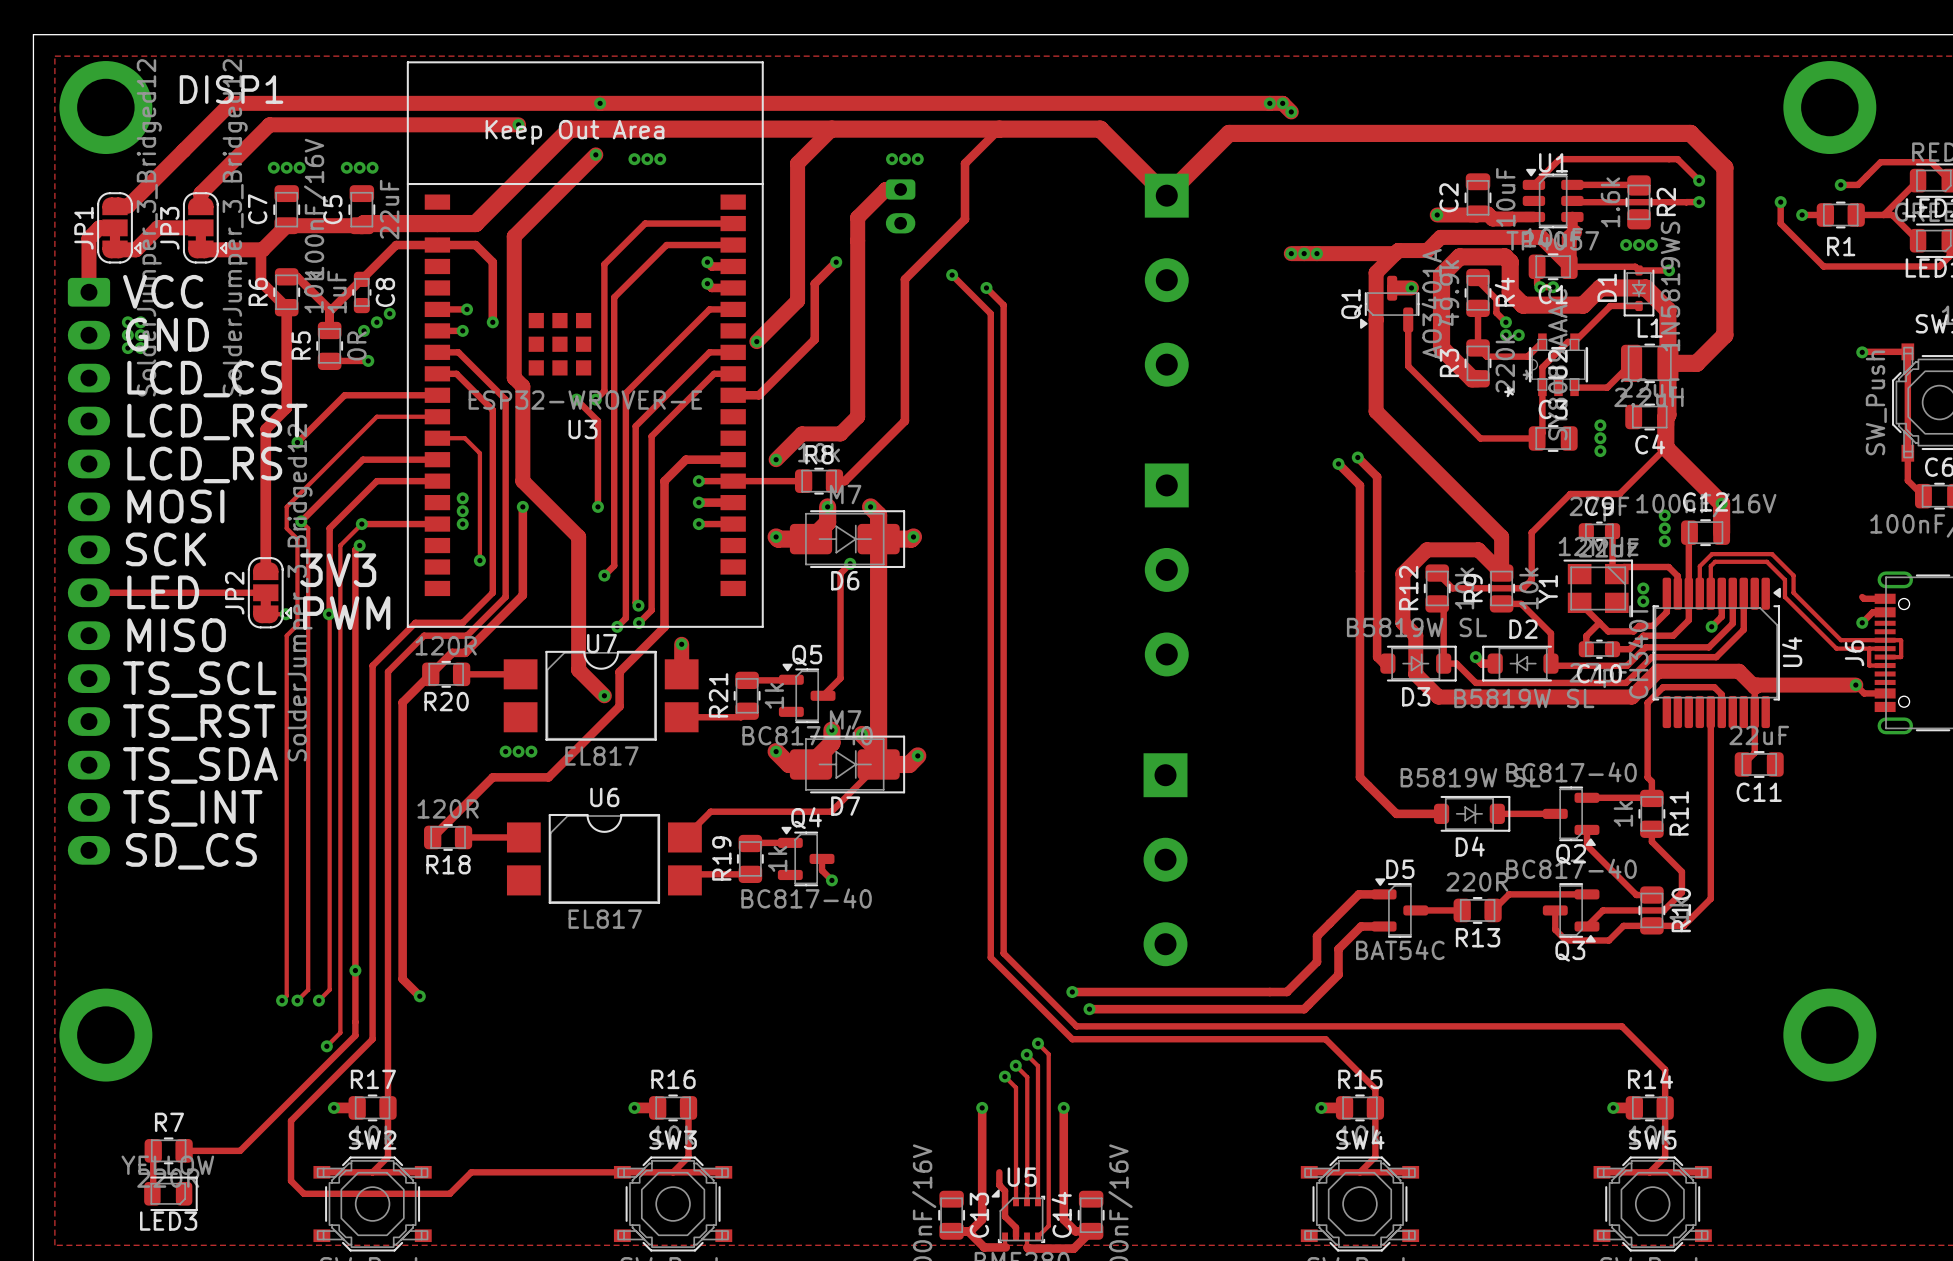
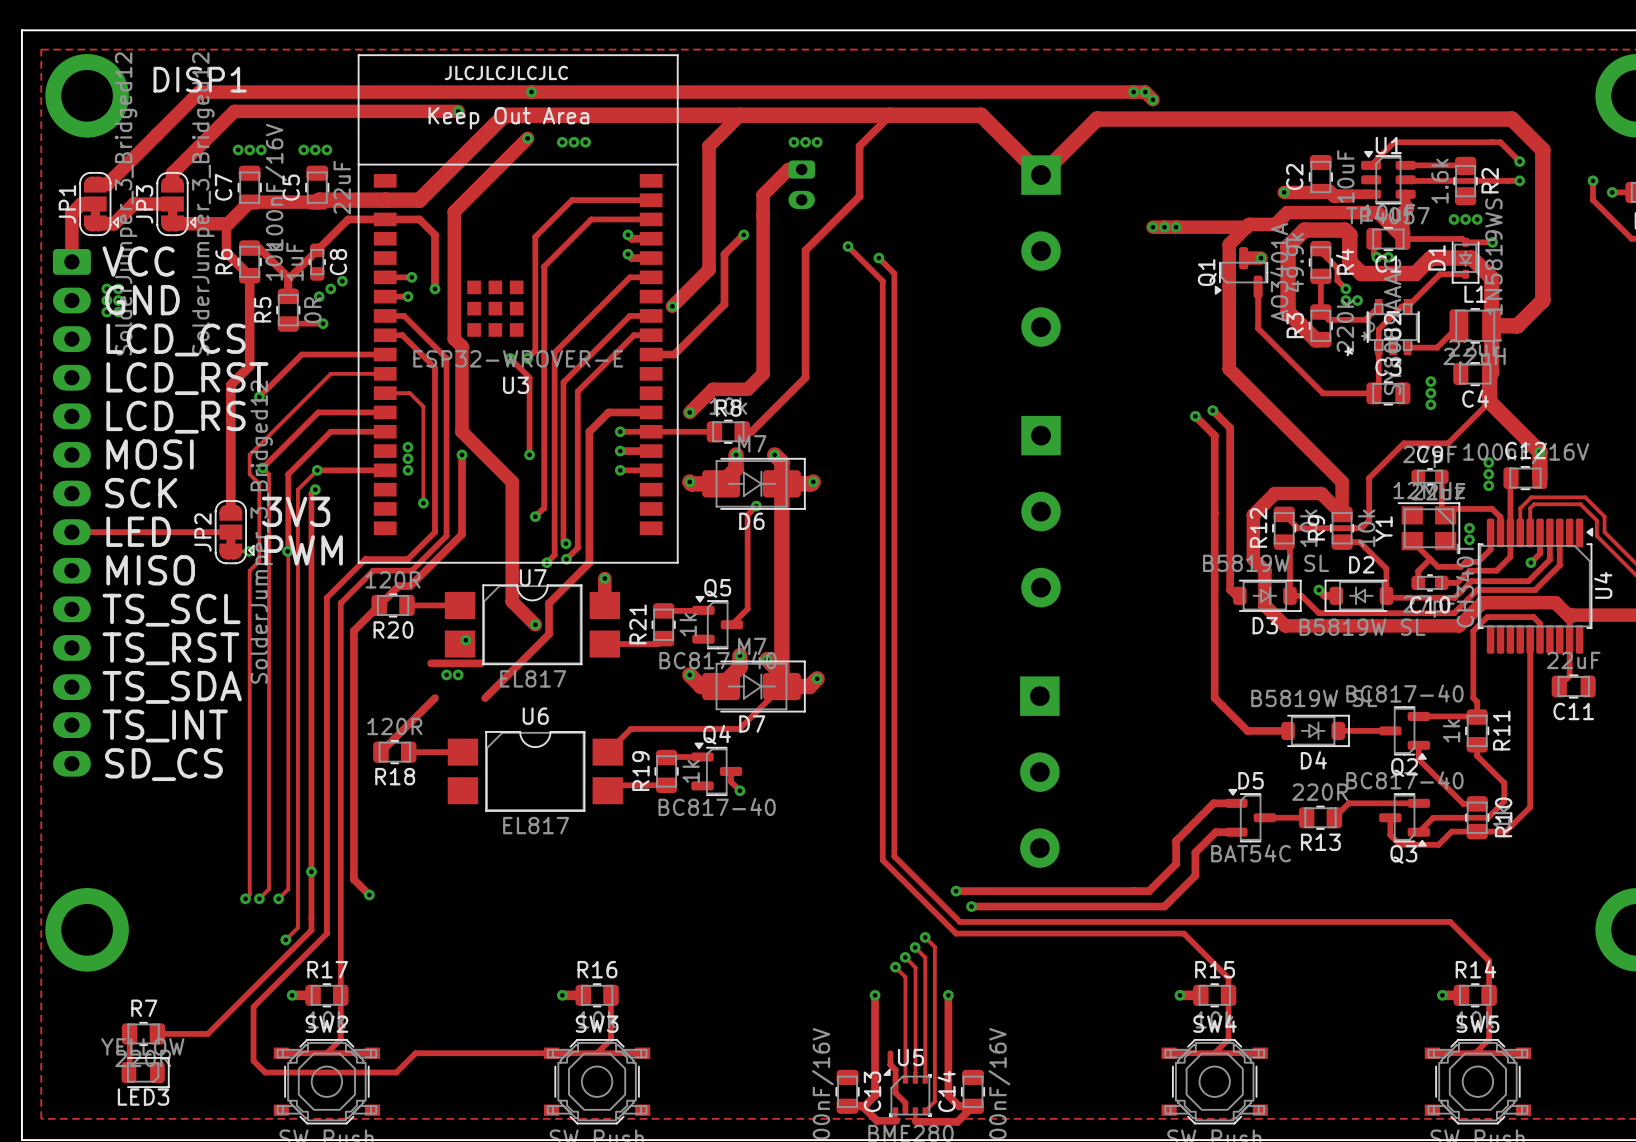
text: none -> JLCJLCJLCJLC (506, 72)
via position: (531, 751) -> (465, 640)
track: (492, 777) (548, 777) -> (431, 663) (481, 663)

